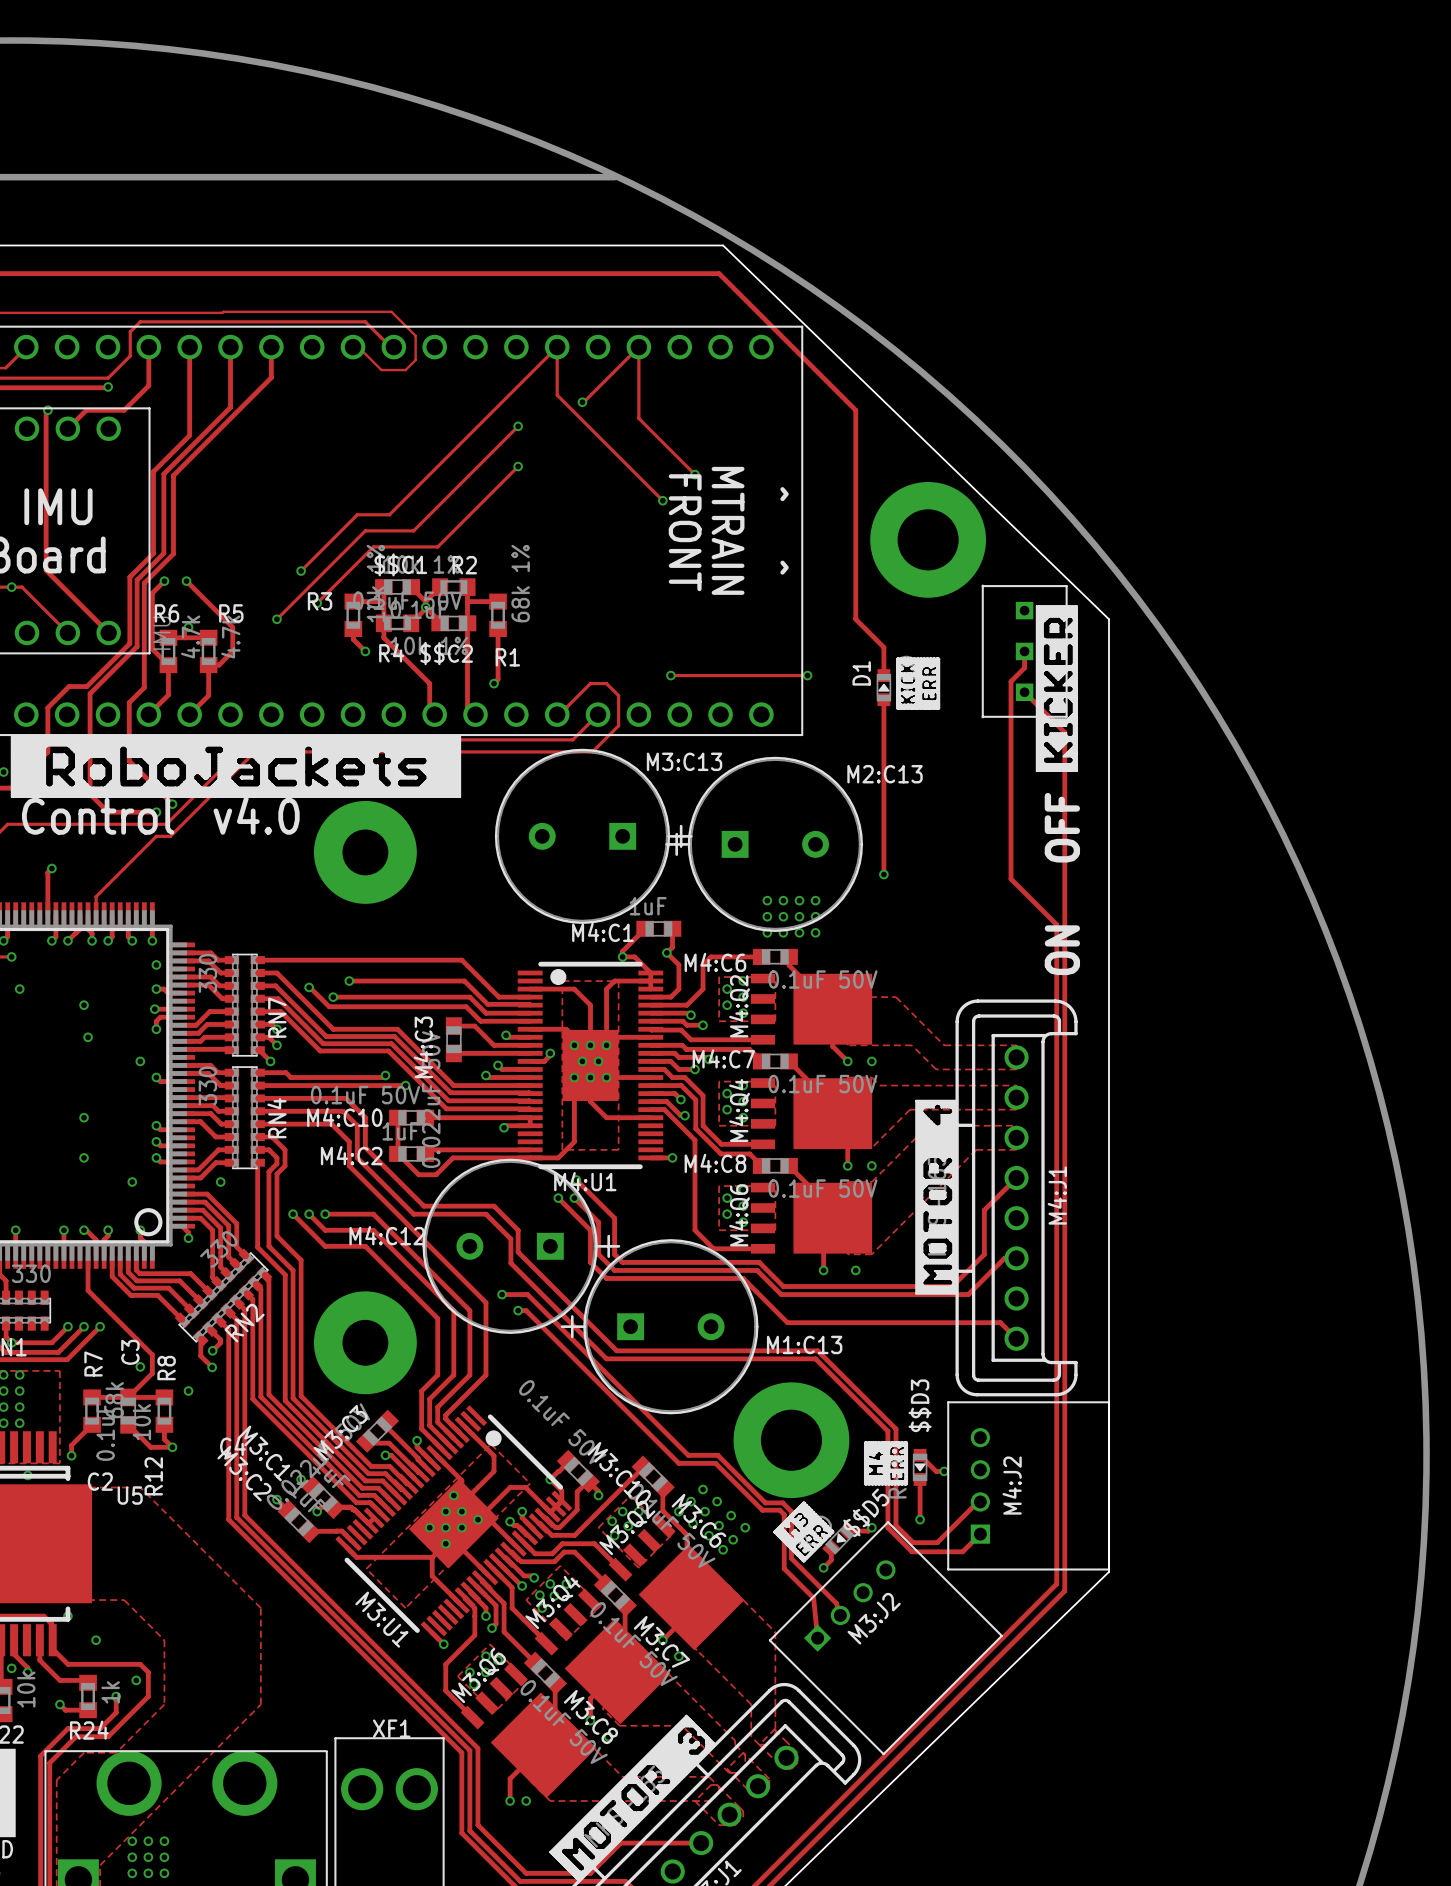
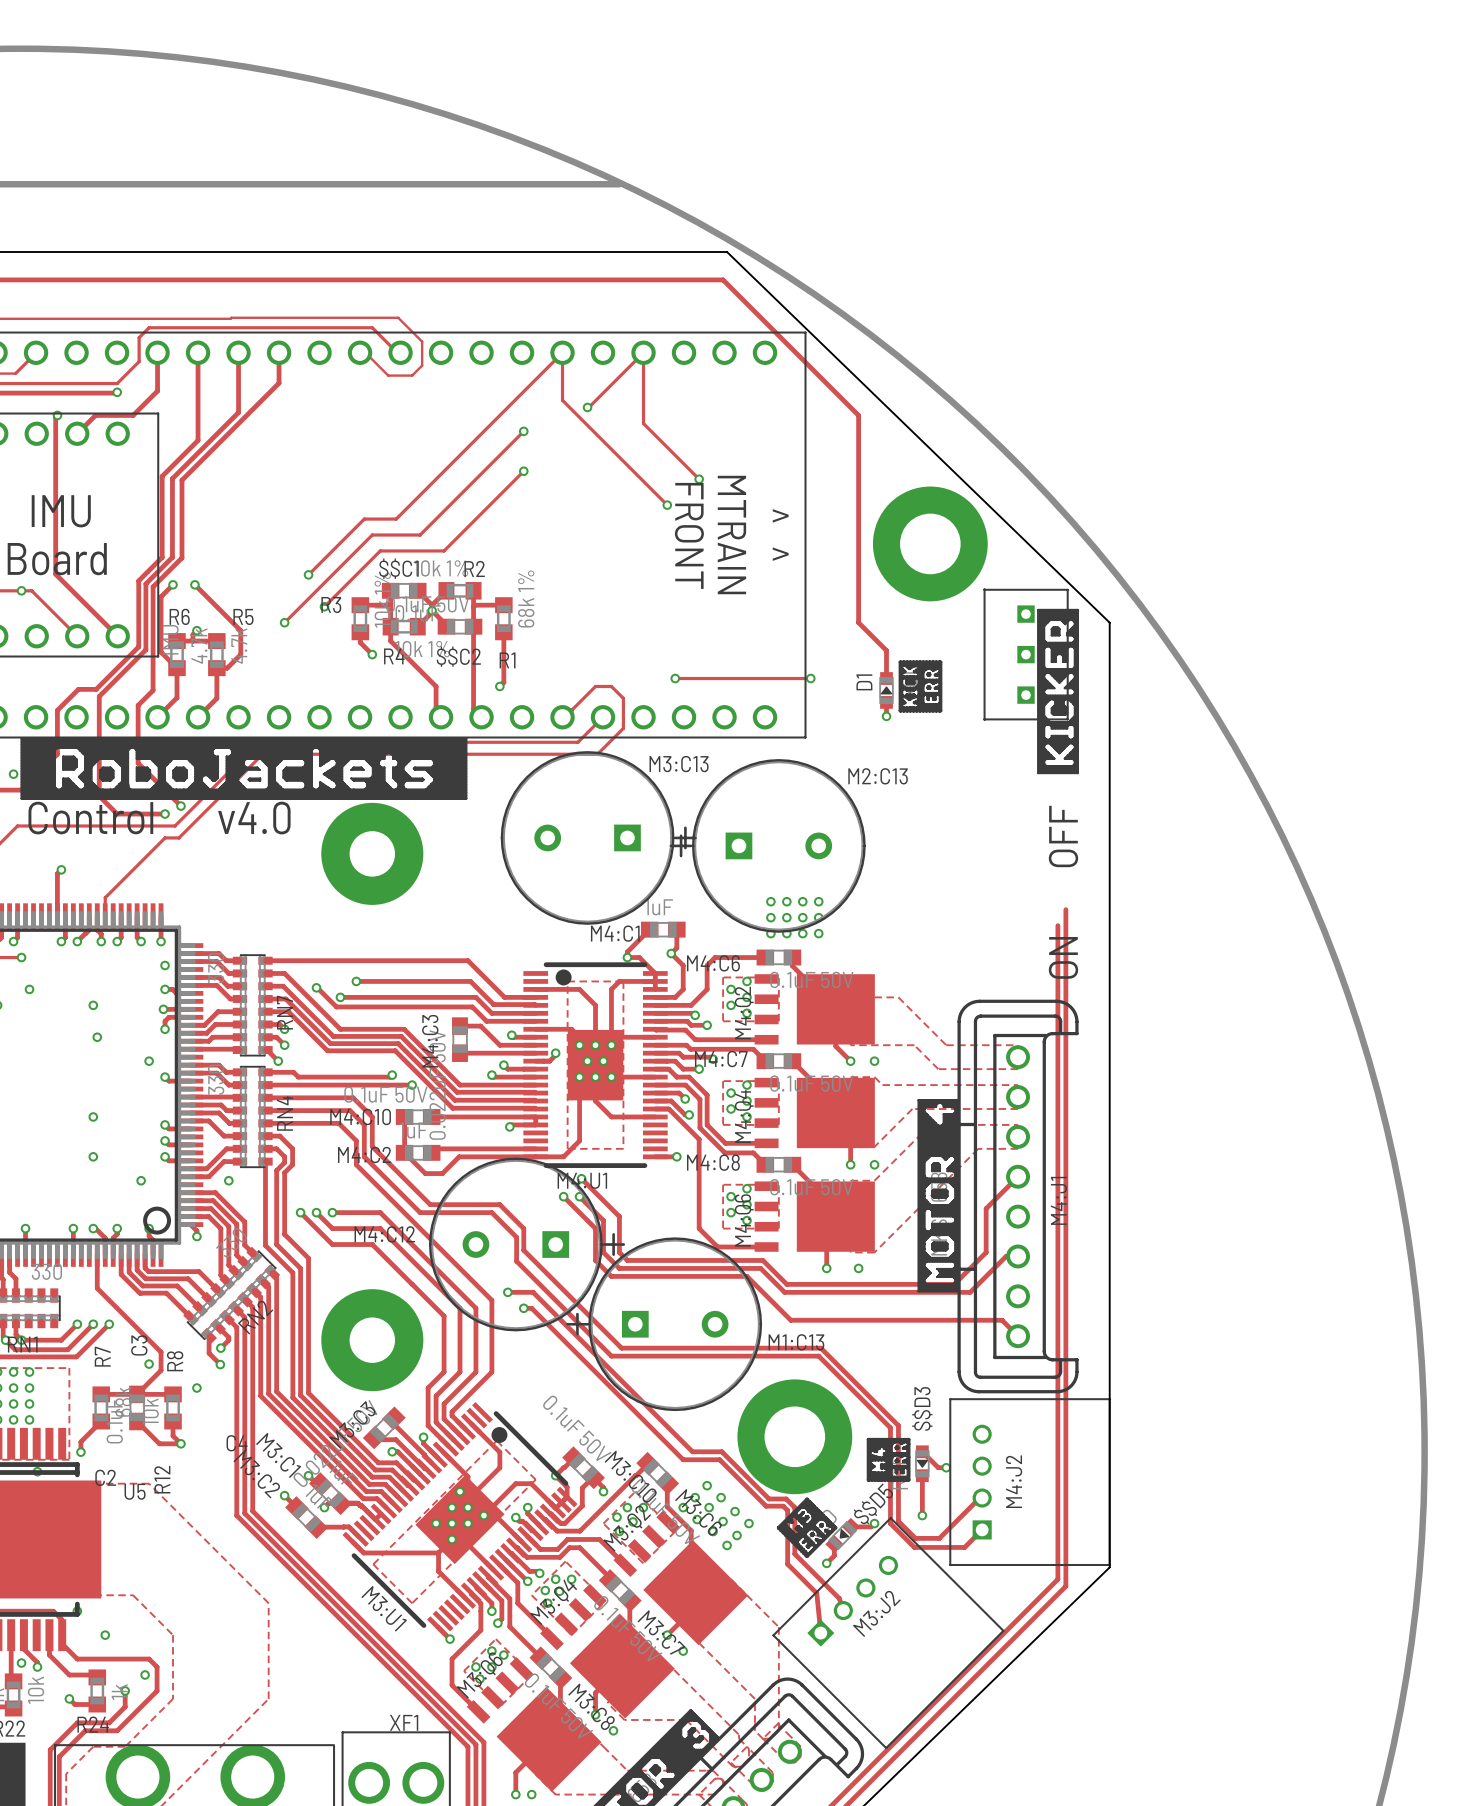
track: (1024, 651) (1024, 667) (1011, 681) (1011, 879) (1056, 924) -> none
track: (1024, 692) (1064, 732) (1064, 908) -> none
track: (883, 713) (883, 874) -> none
via: none -> (886, 716)
via: (883, 874) -> none

